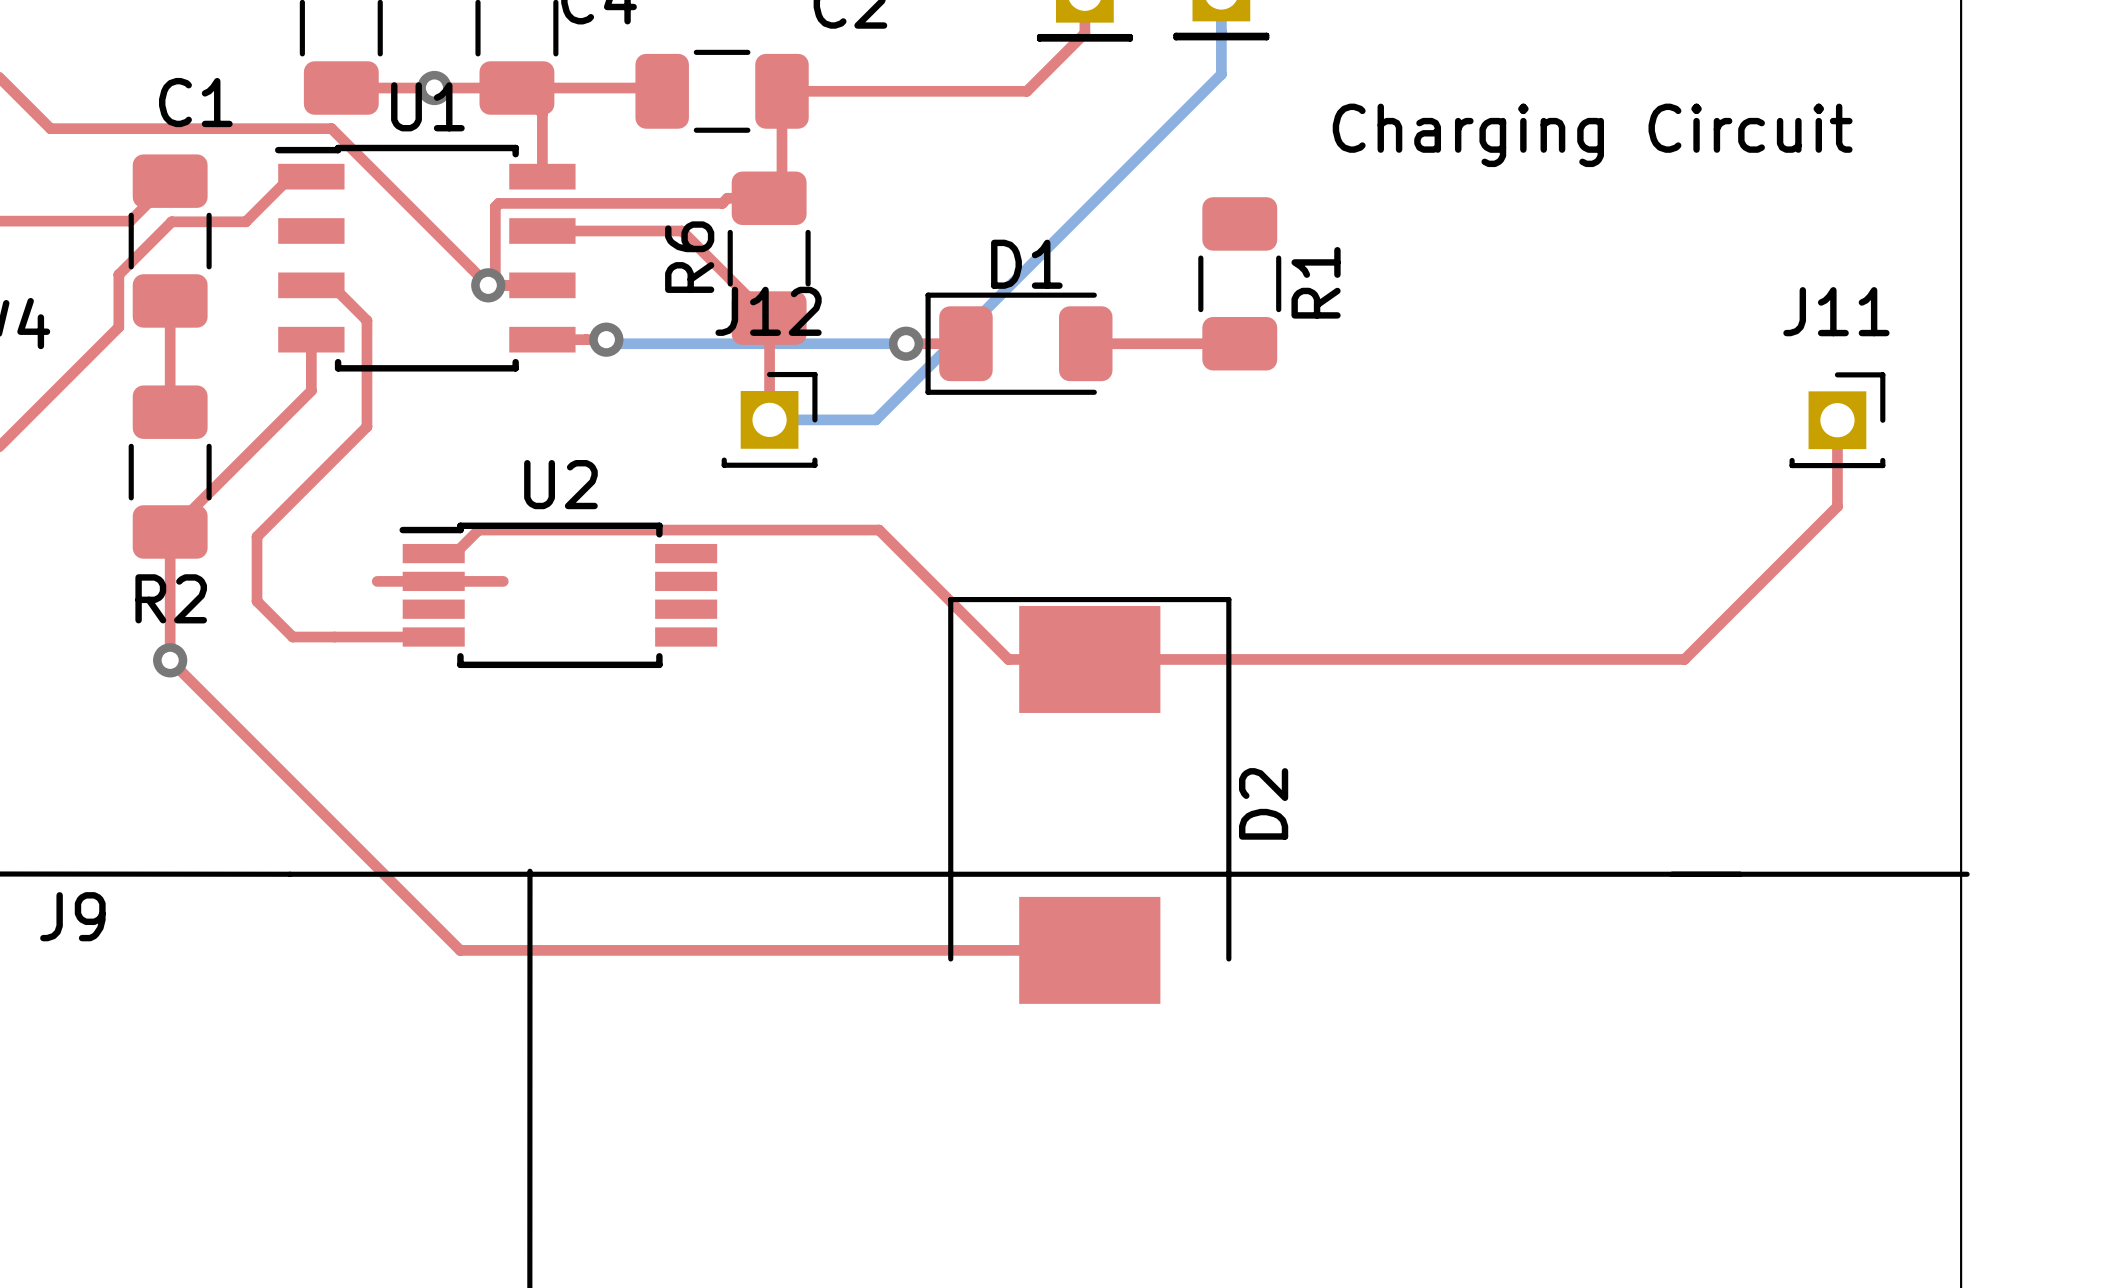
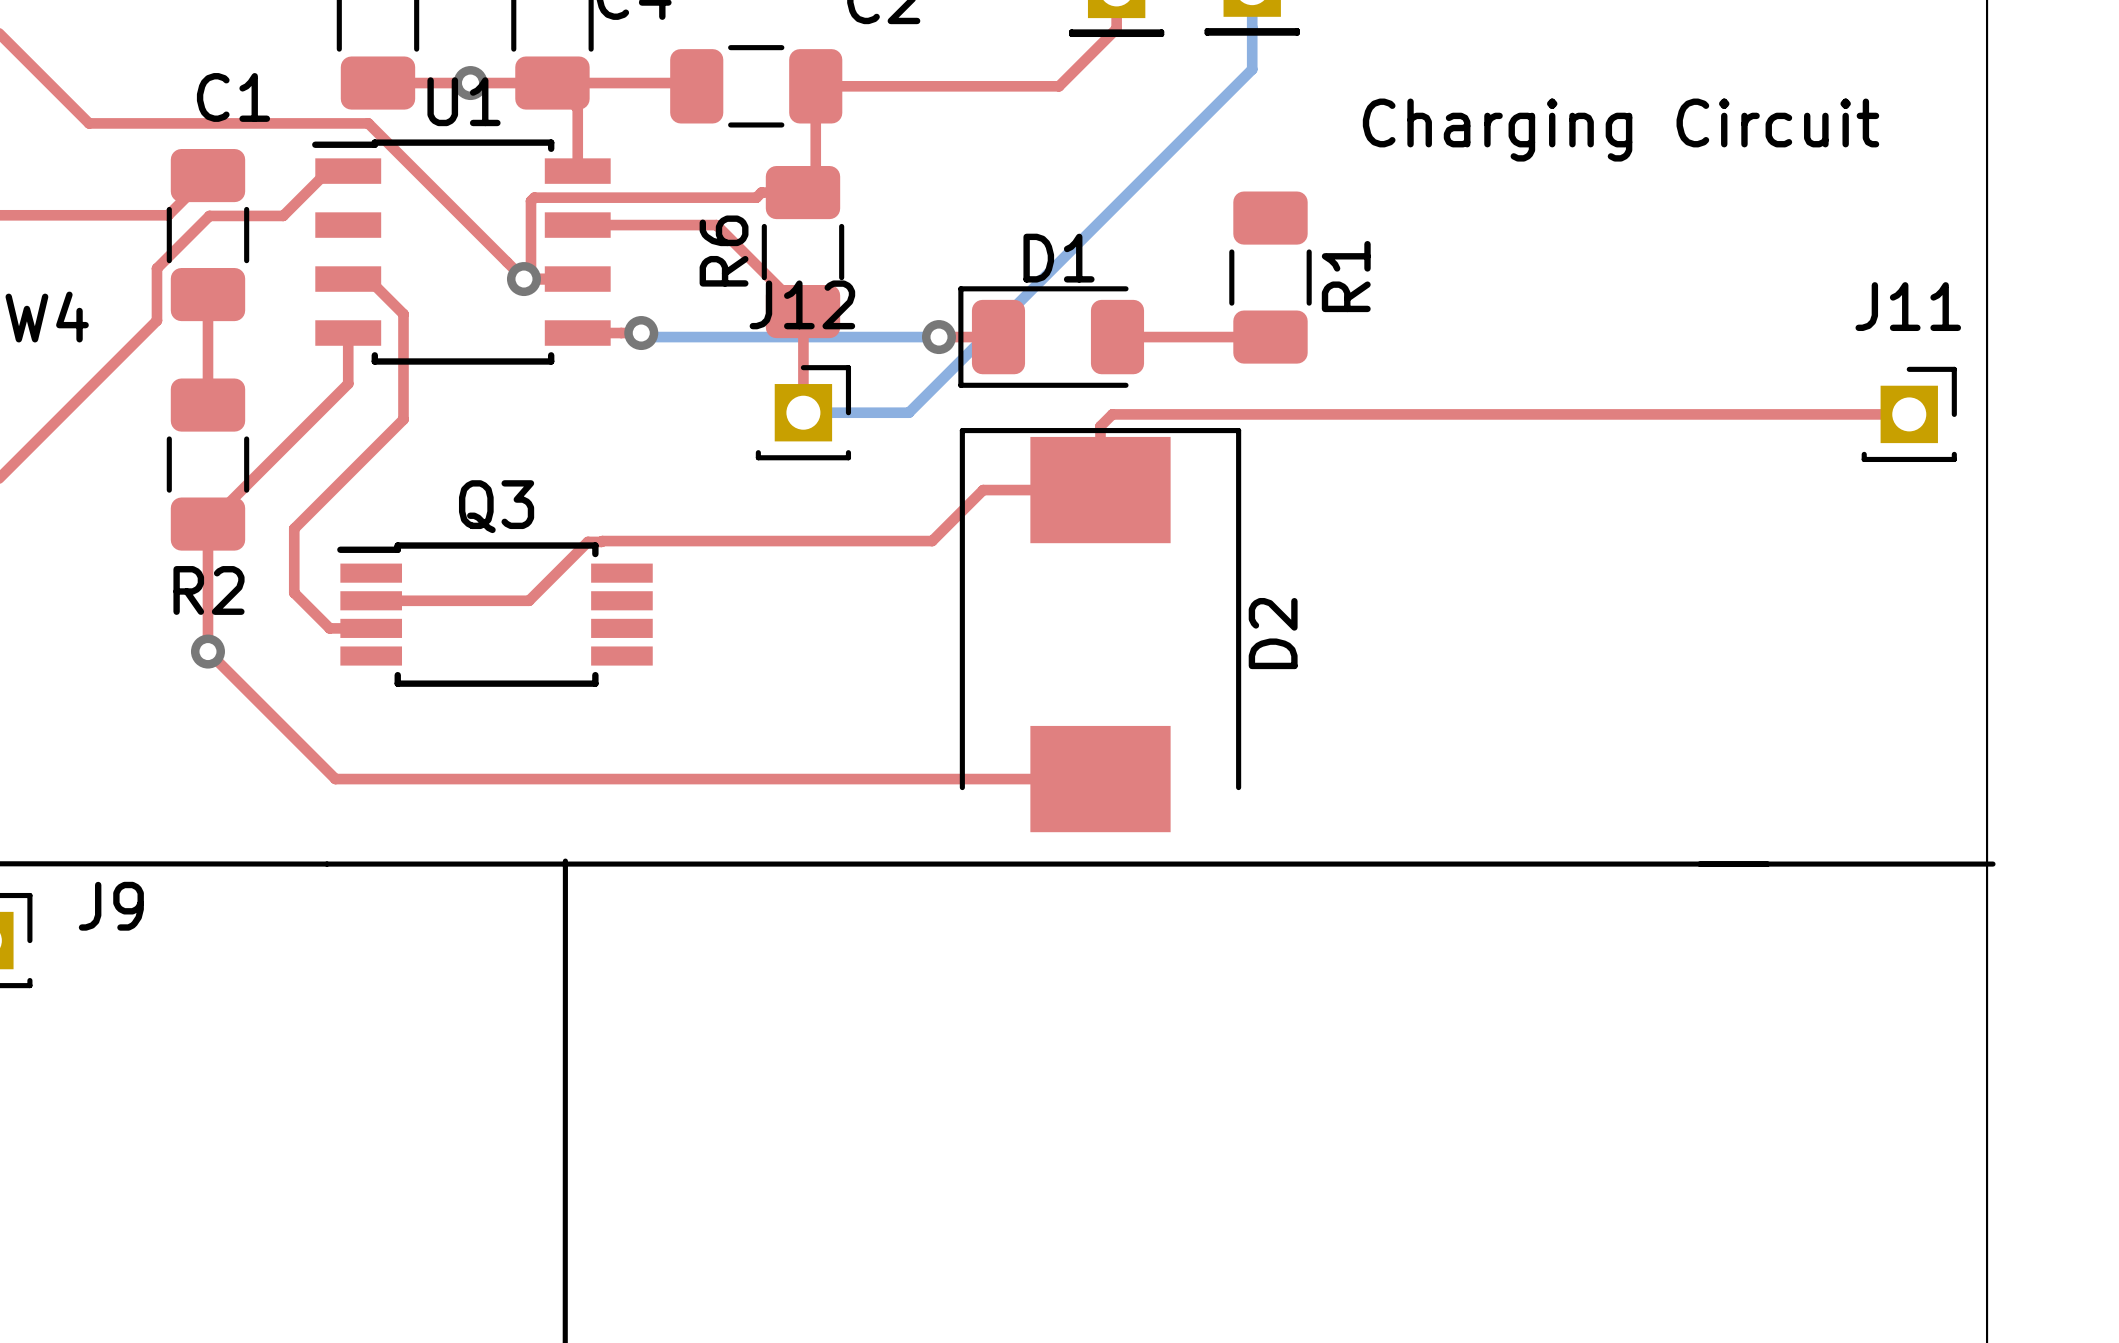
top track: (1837, 420) (1837, 506) (1684, 659) (1008, 659) (879, 530) (478, 530) (455, 553) (433, 553) -> none
J11 position: (1837, 420) -> (1909, 414)
top track: none -> (1909, 414) (1112, 414) (1100, 426) (1100, 490) (983, 490) (932, 541) (587, 541) (529, 600) (371, 600)
top track: (377, 581) (503, 581) -> none
U2: (558, 595) -> none
Q3: none -> (494, 614)
top track: (334, 637) (433, 637) -> none
top track: (298, 788) (460, 950) (1089, 950) -> (335, 779) (1100, 779)
D2 position: (1089, 800) -> (1100, 630)

